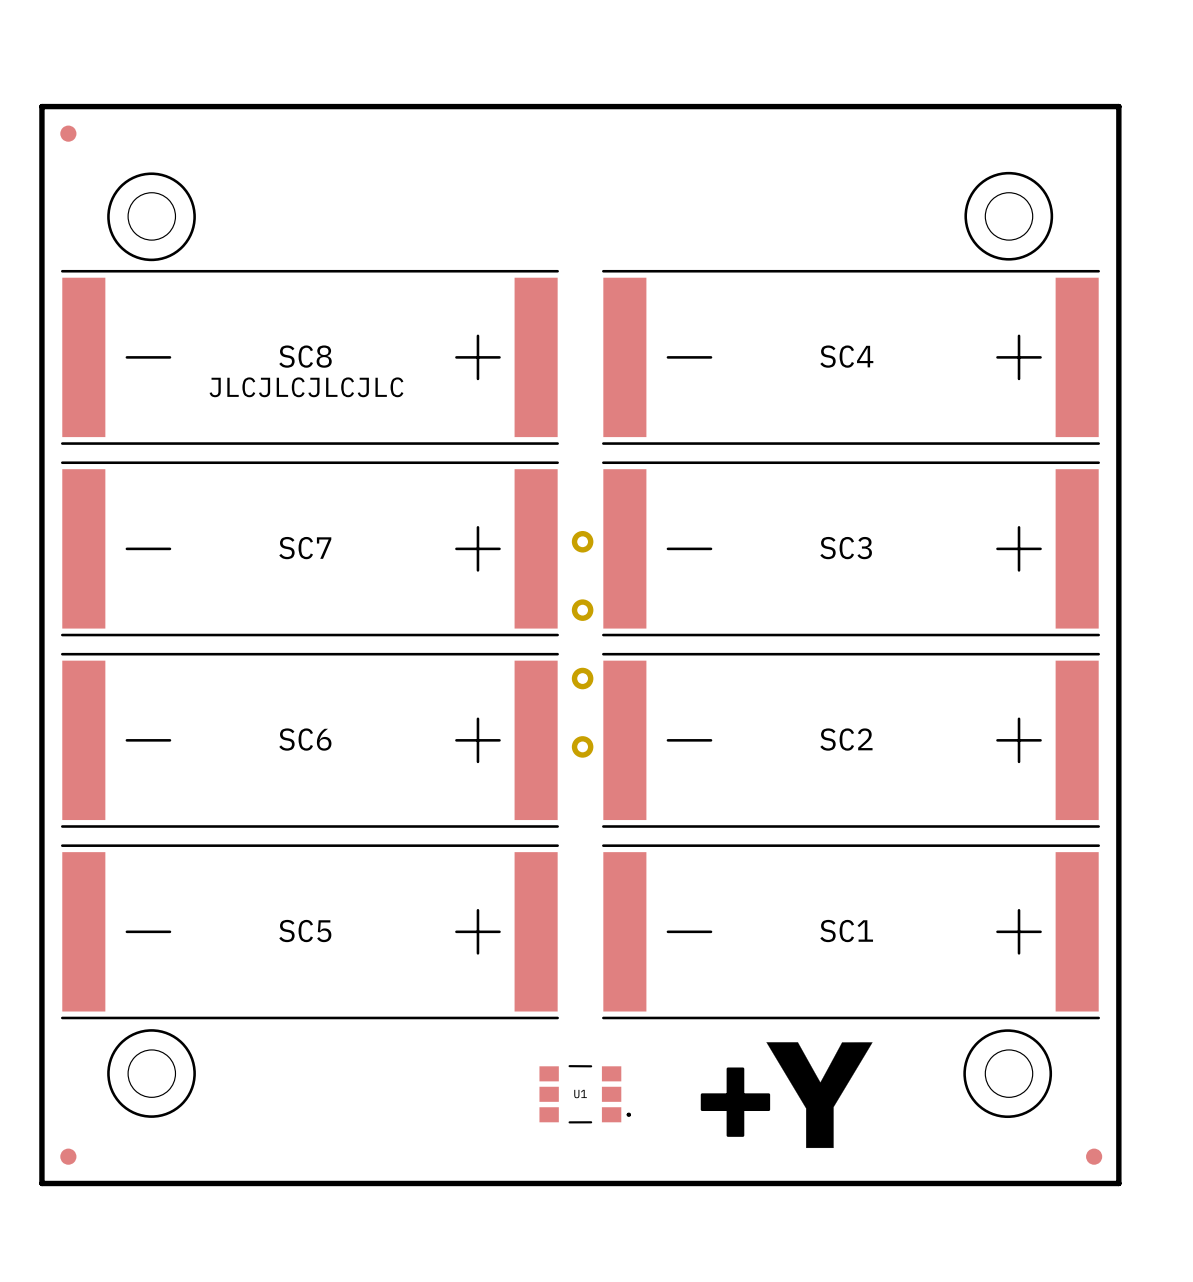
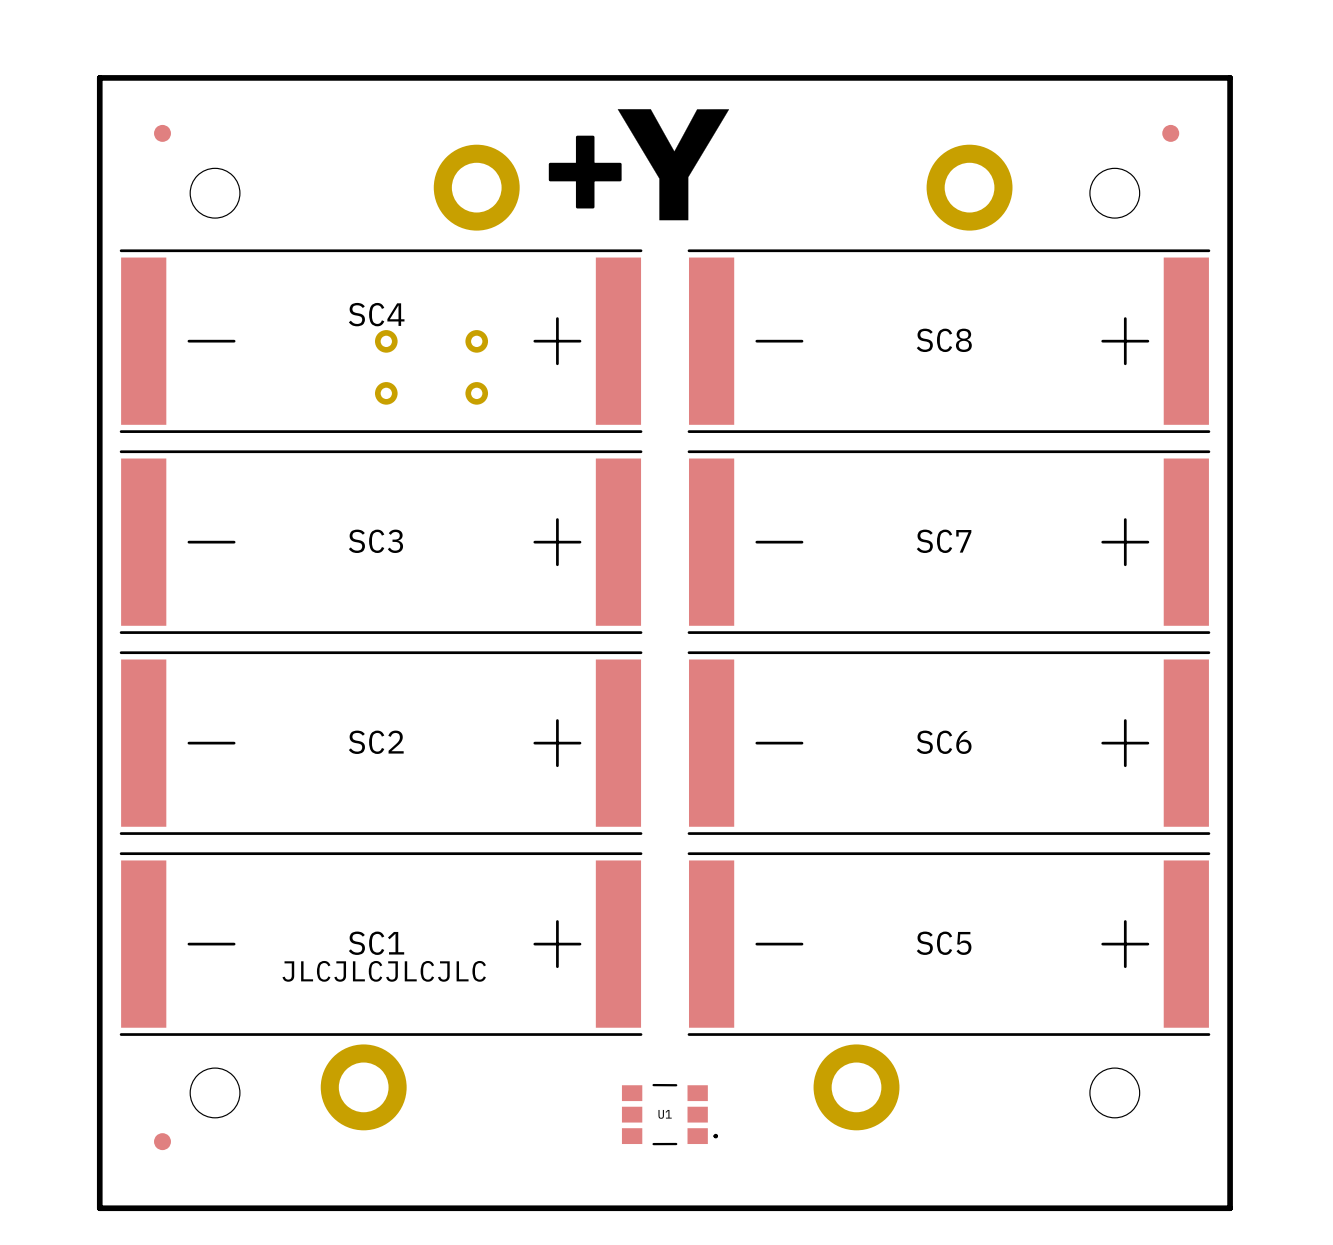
part position: (68, 133) -> (162, 133)
drawing: none -> [548, 109, 730, 221]
part: none -> (1170, 133)
drawing: [964, 171, 1054, 261] -> none
drawing: [107, 172, 196, 262] -> none
part: none -> (476, 187)
part: none -> (969, 187)
SC8 name: SC8 (305, 356) -> SC4 (376, 314)
SC4 name: SC4 (846, 356) -> SC8 (944, 340)
part: none -> (386, 341)
part: none -> (476, 341)
text: JLCJLCJLCJLC (306, 387) -> none
part: none -> (386, 393)
part: none -> (476, 393)
part: (582, 541) -> none
SC7 name: SC7 (305, 548) -> SC3 (375, 541)
SC3 name: SC3 (846, 548) -> SC7 (944, 541)
part: (582, 610) -> none
part: (582, 678) -> none
SC6 name: SC6 (305, 739) -> SC2 (376, 742)
SC2 name: SC2 (846, 739) -> SC6 (944, 742)
part: (582, 746) -> none
SC5 name: SC5 (305, 931) -> SC1 (376, 943)
SC1 name: SC1 (846, 931) -> SC5 (944, 943)
text: none -> JLCJLCJLCJLC (384, 971)
drawing: [107, 1029, 196, 1118] -> none
drawing: [963, 1029, 1053, 1119] -> none
drawing: [700, 1042, 873, 1149] -> none
part: none -> (363, 1087)
part: none -> (856, 1087)
part position: (68, 1156) -> (162, 1141)
part: (1094, 1156) -> none

